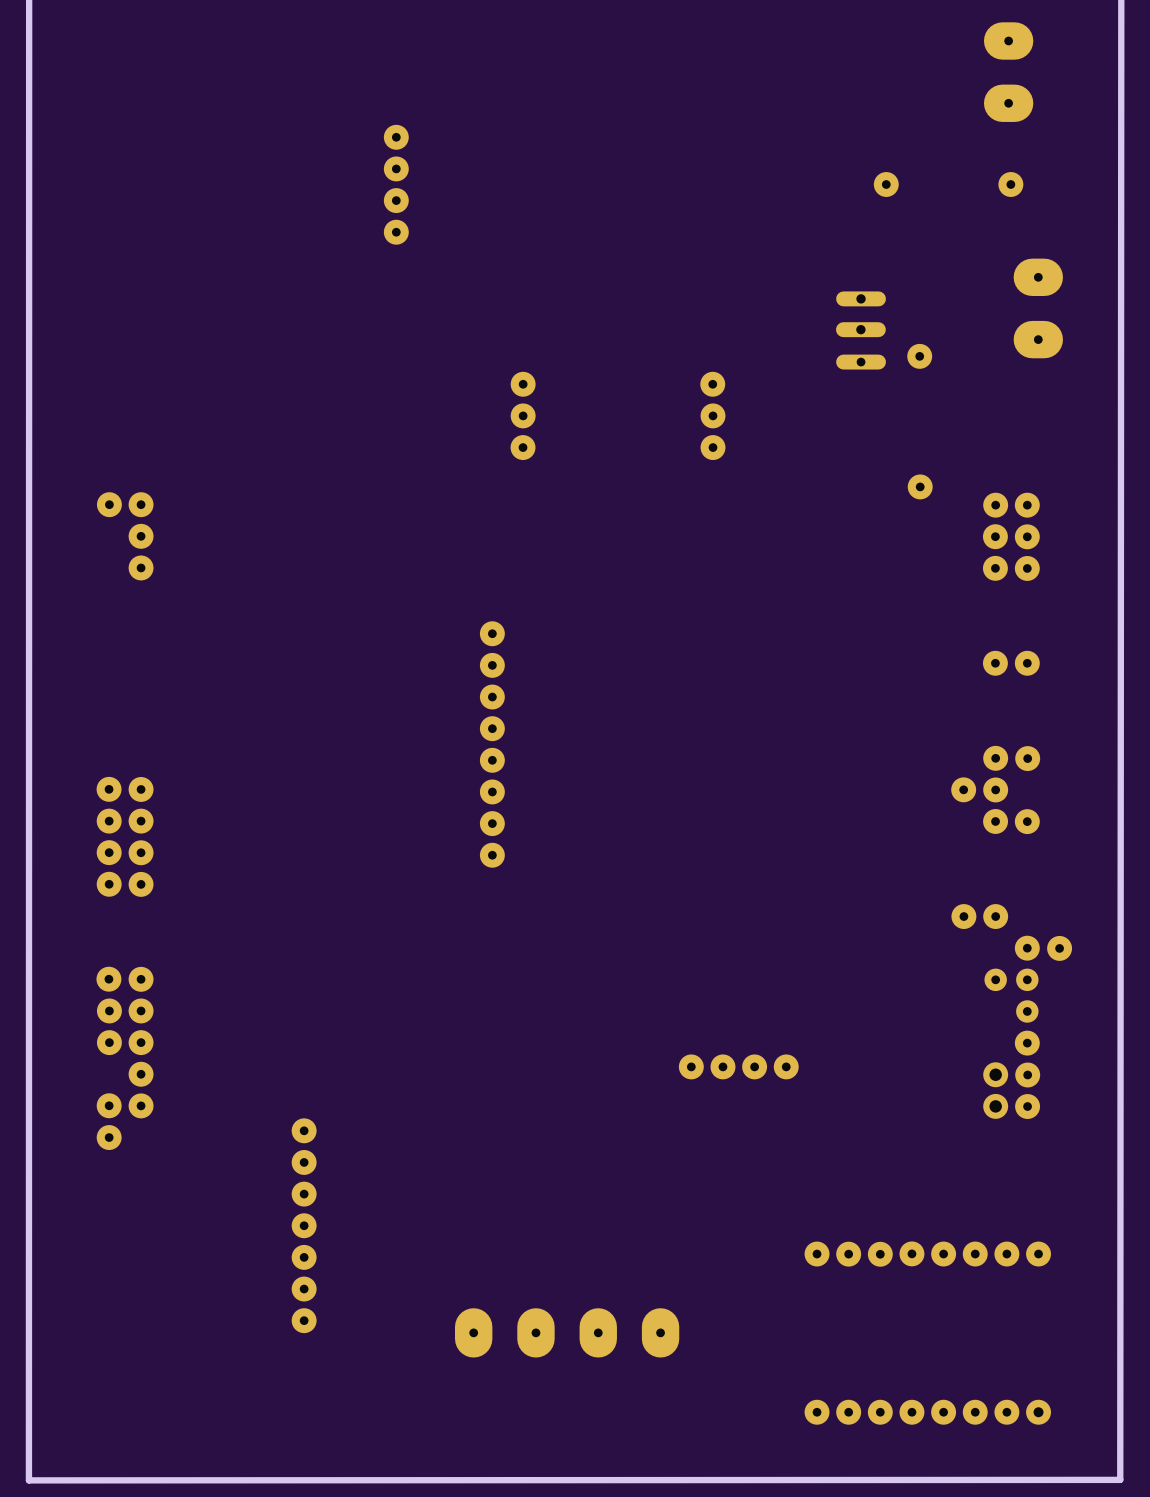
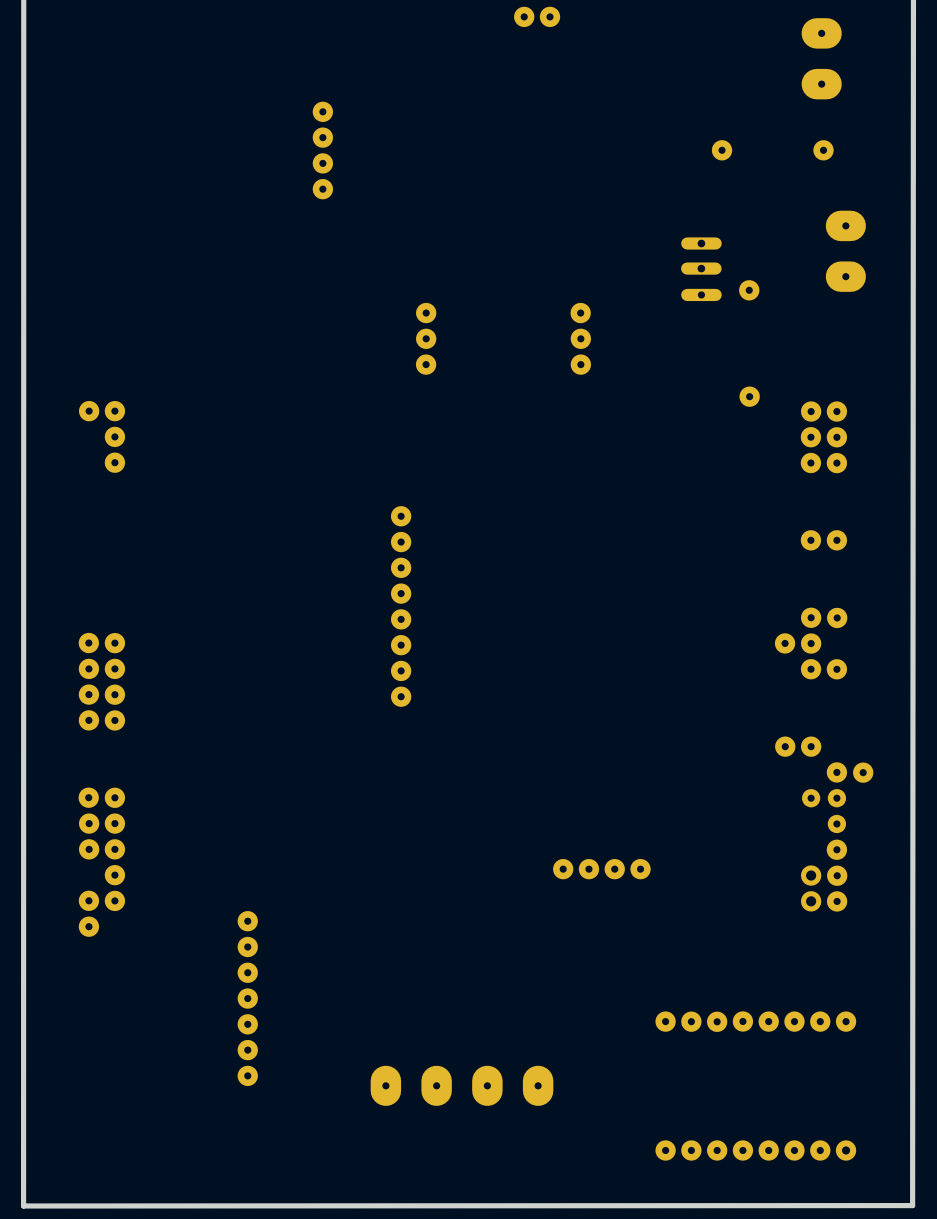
part: none -> (537, 16)

